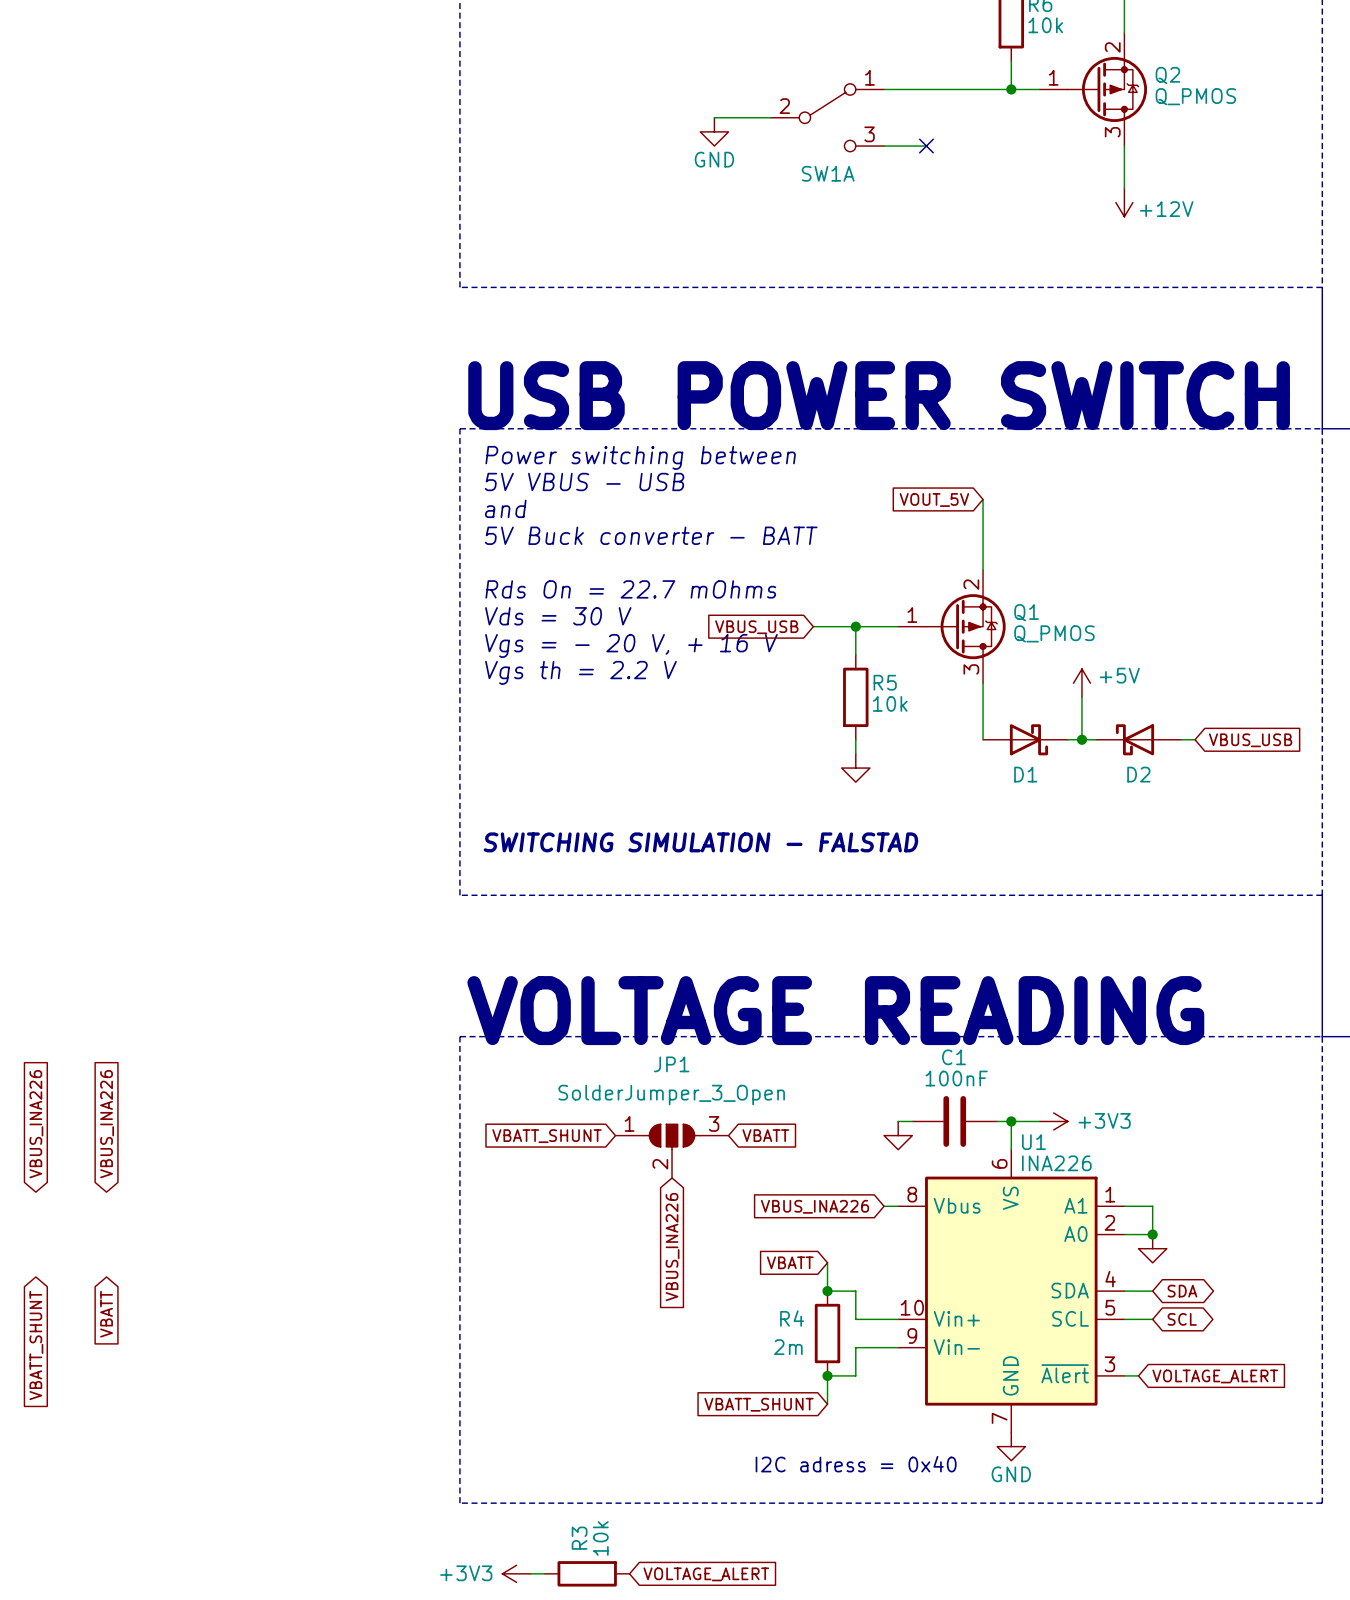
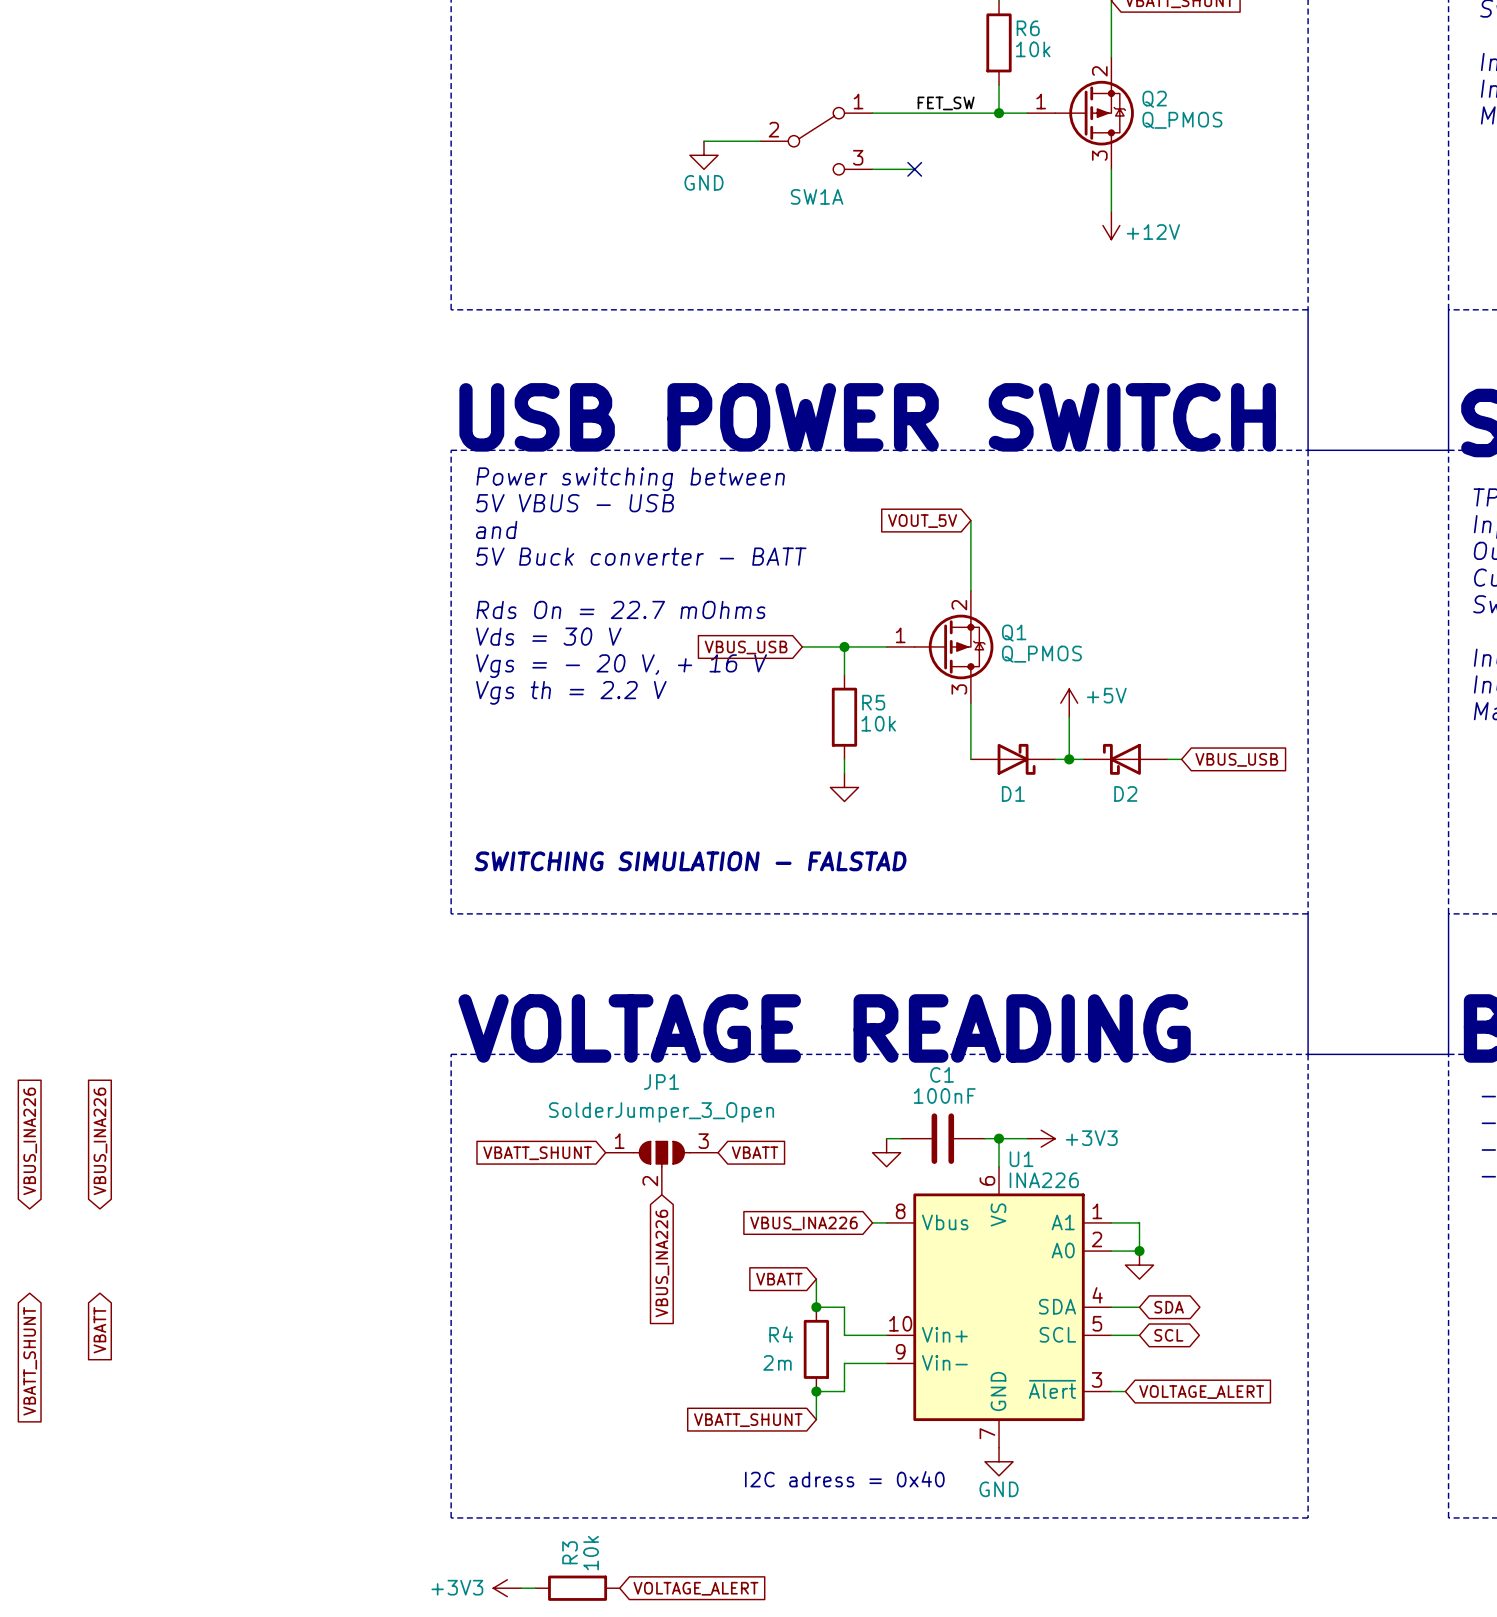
label: none -> FET_SW (946, 103)

